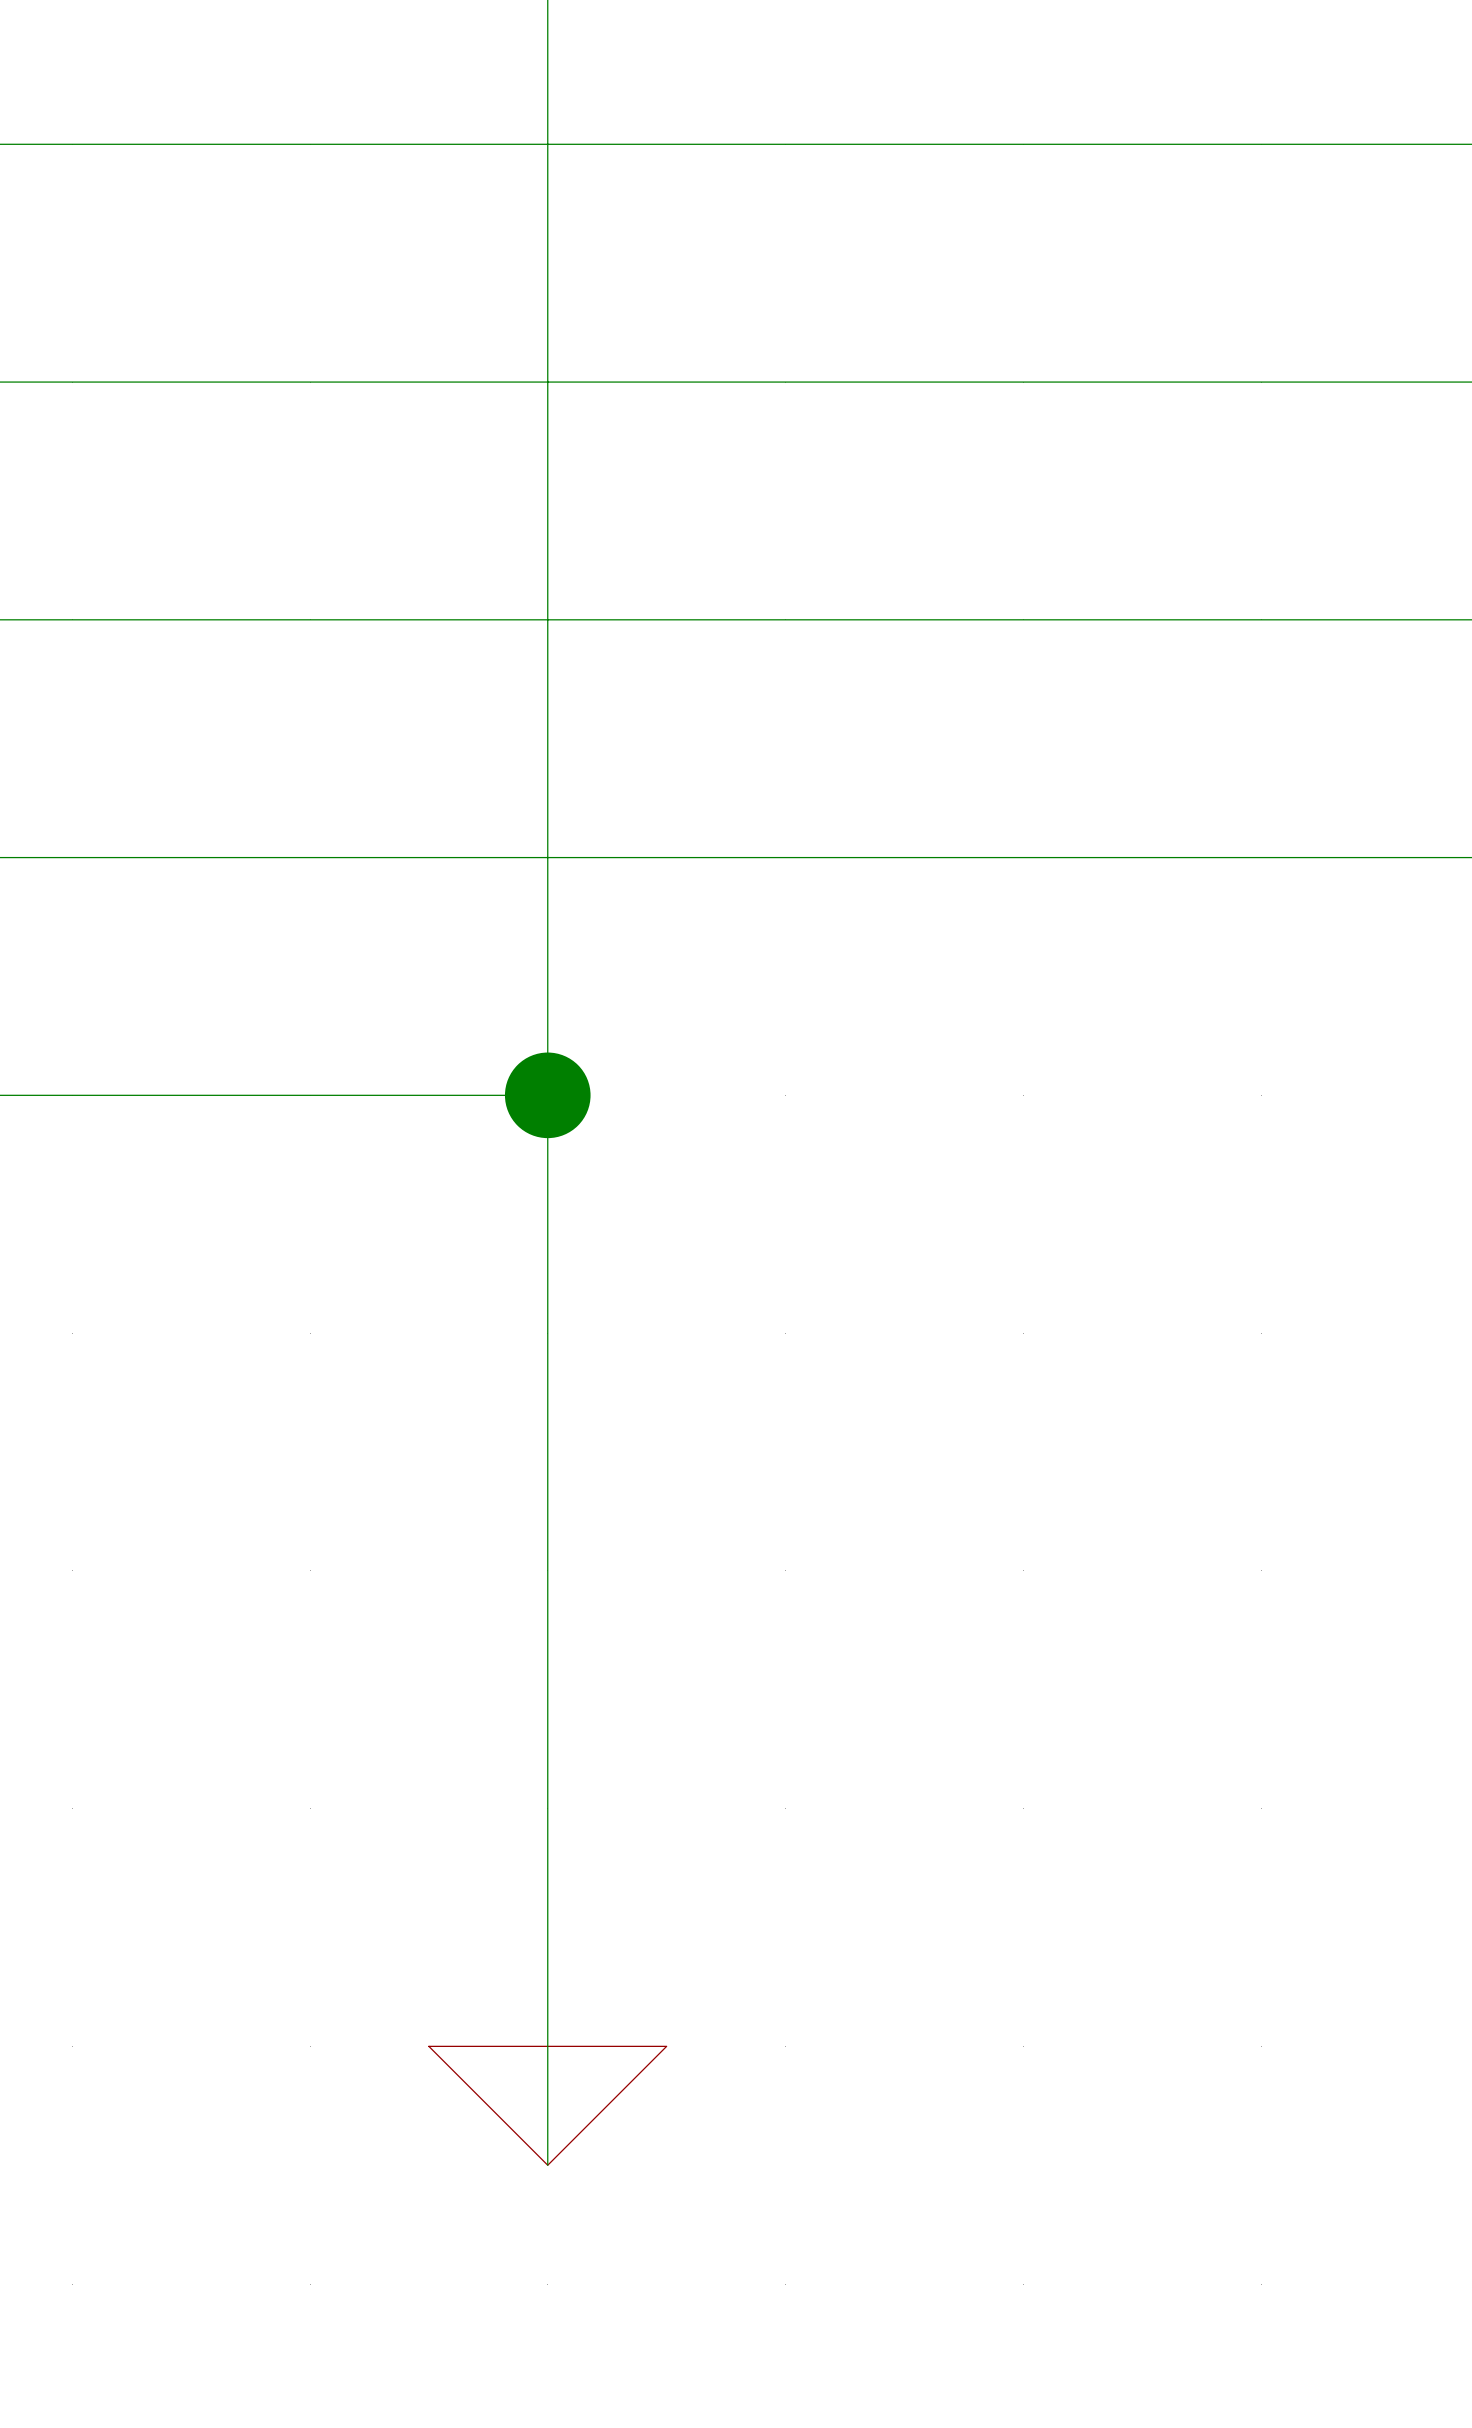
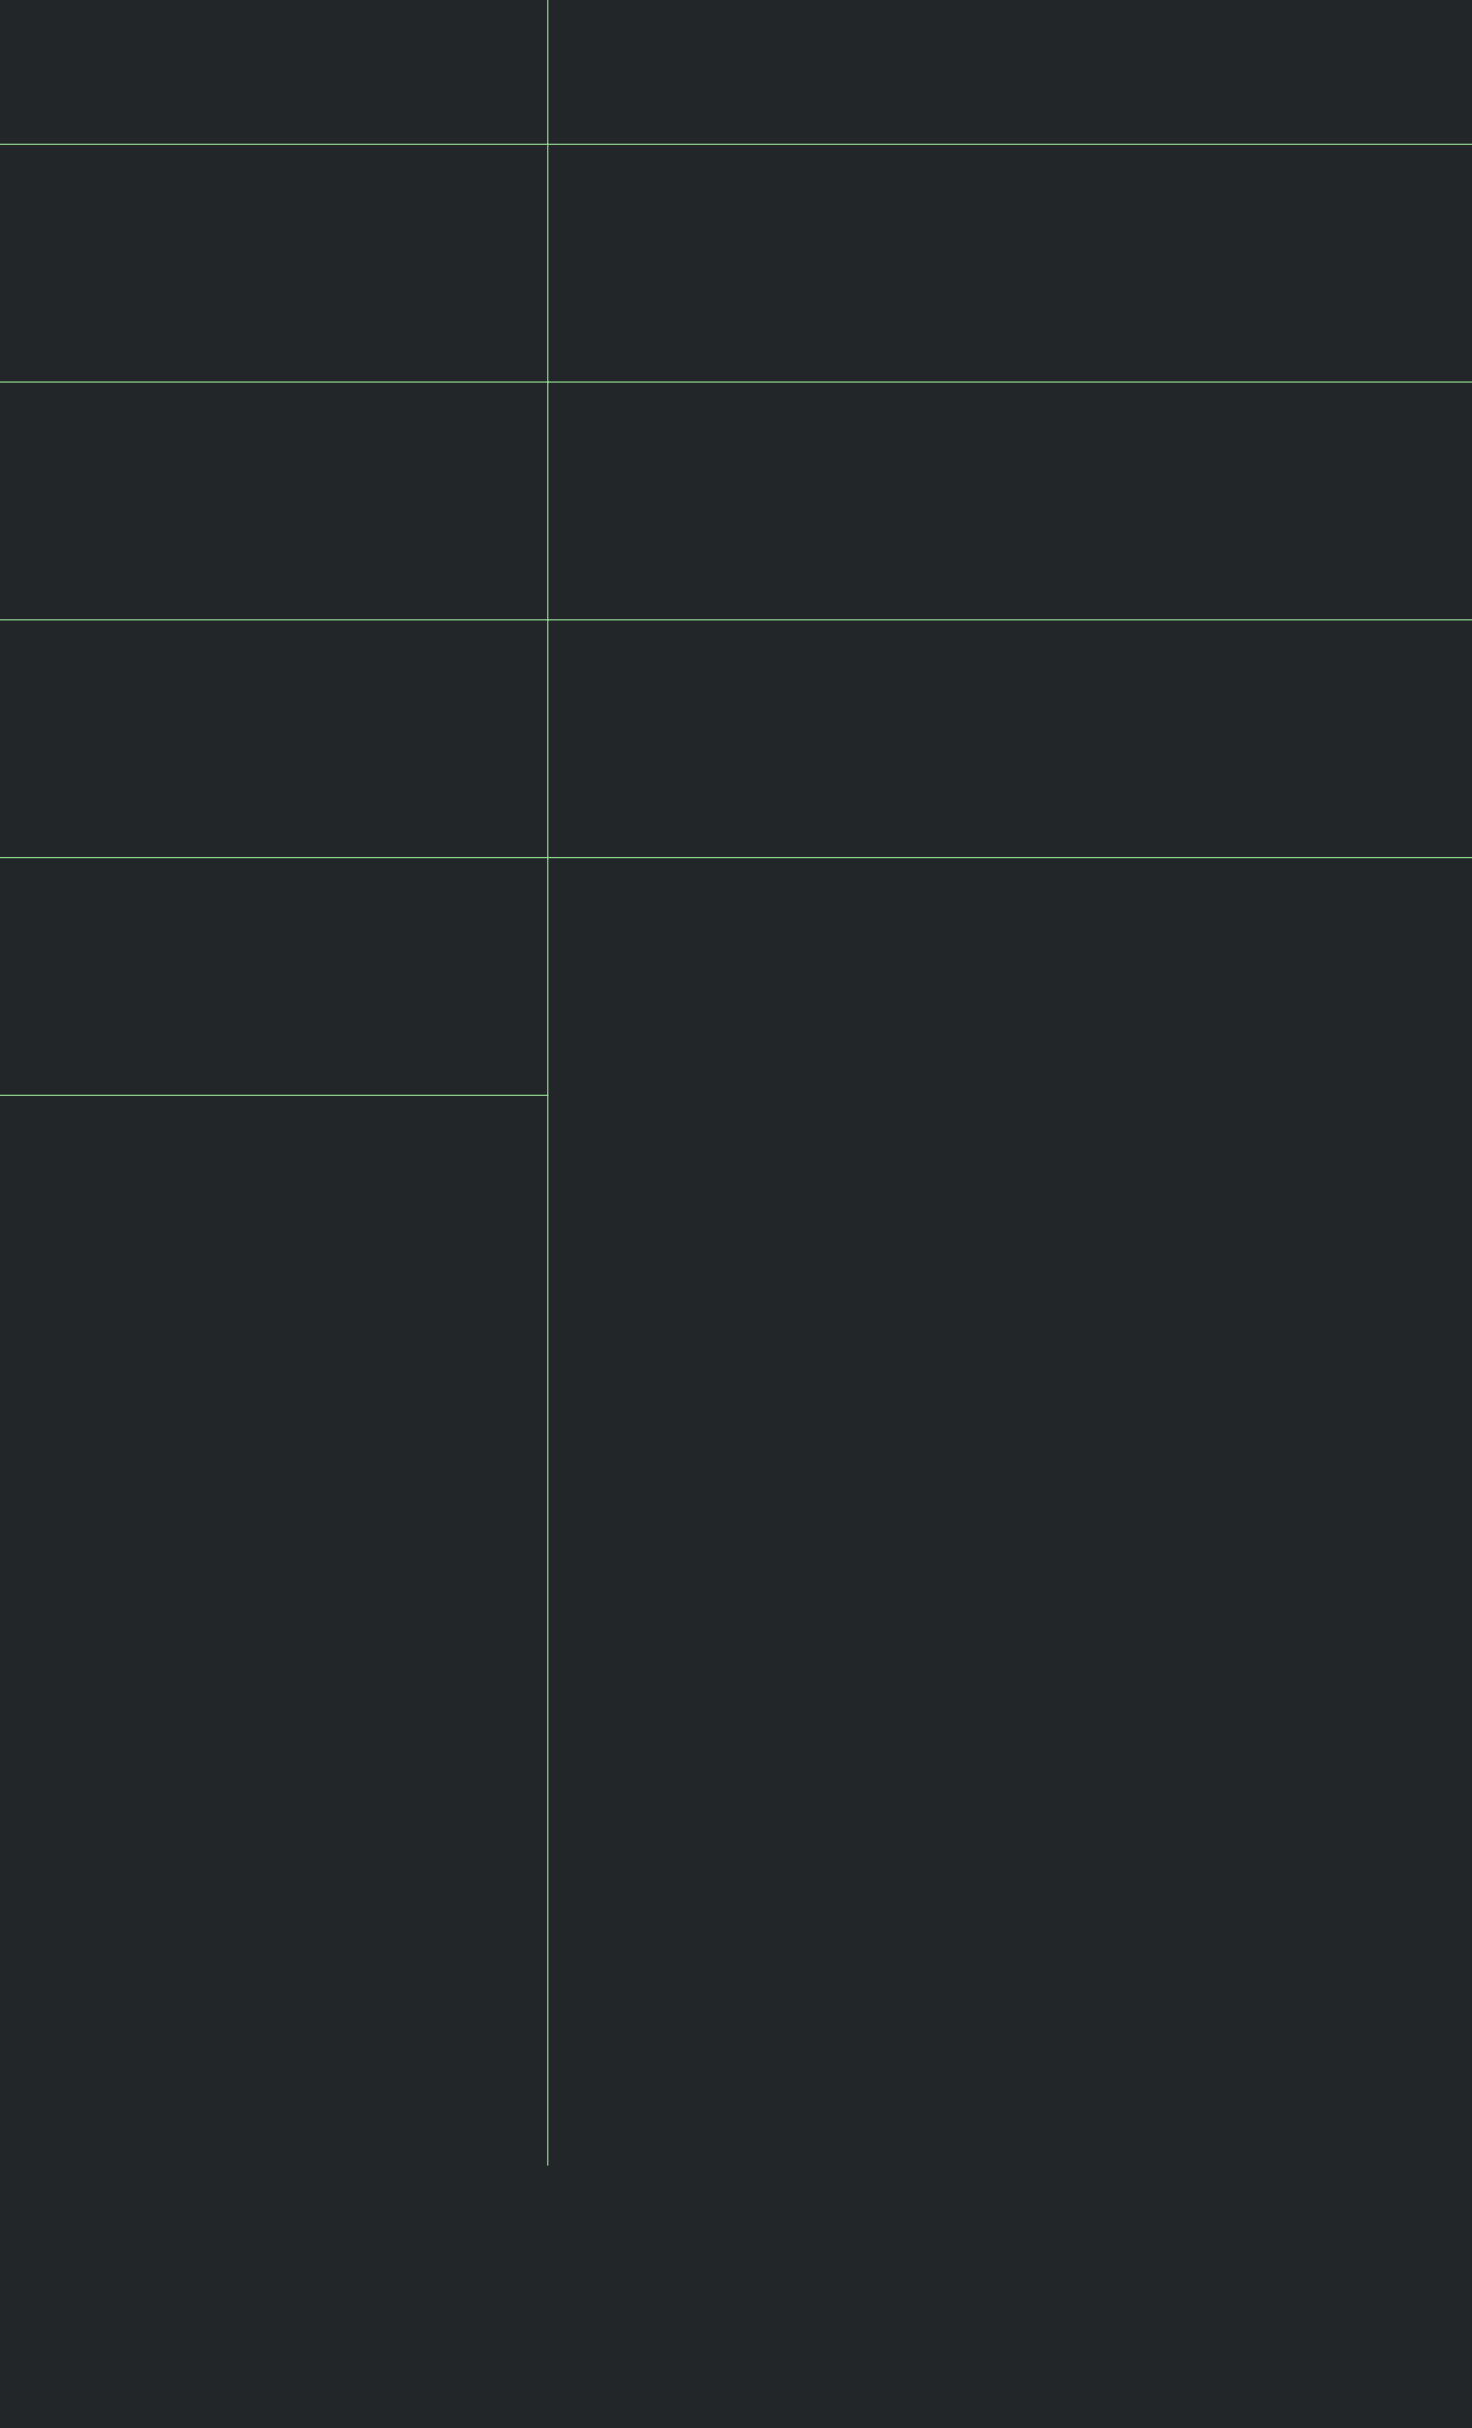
junction: (547, 1095) -> none
power symbol: (547, 2105) -> none

